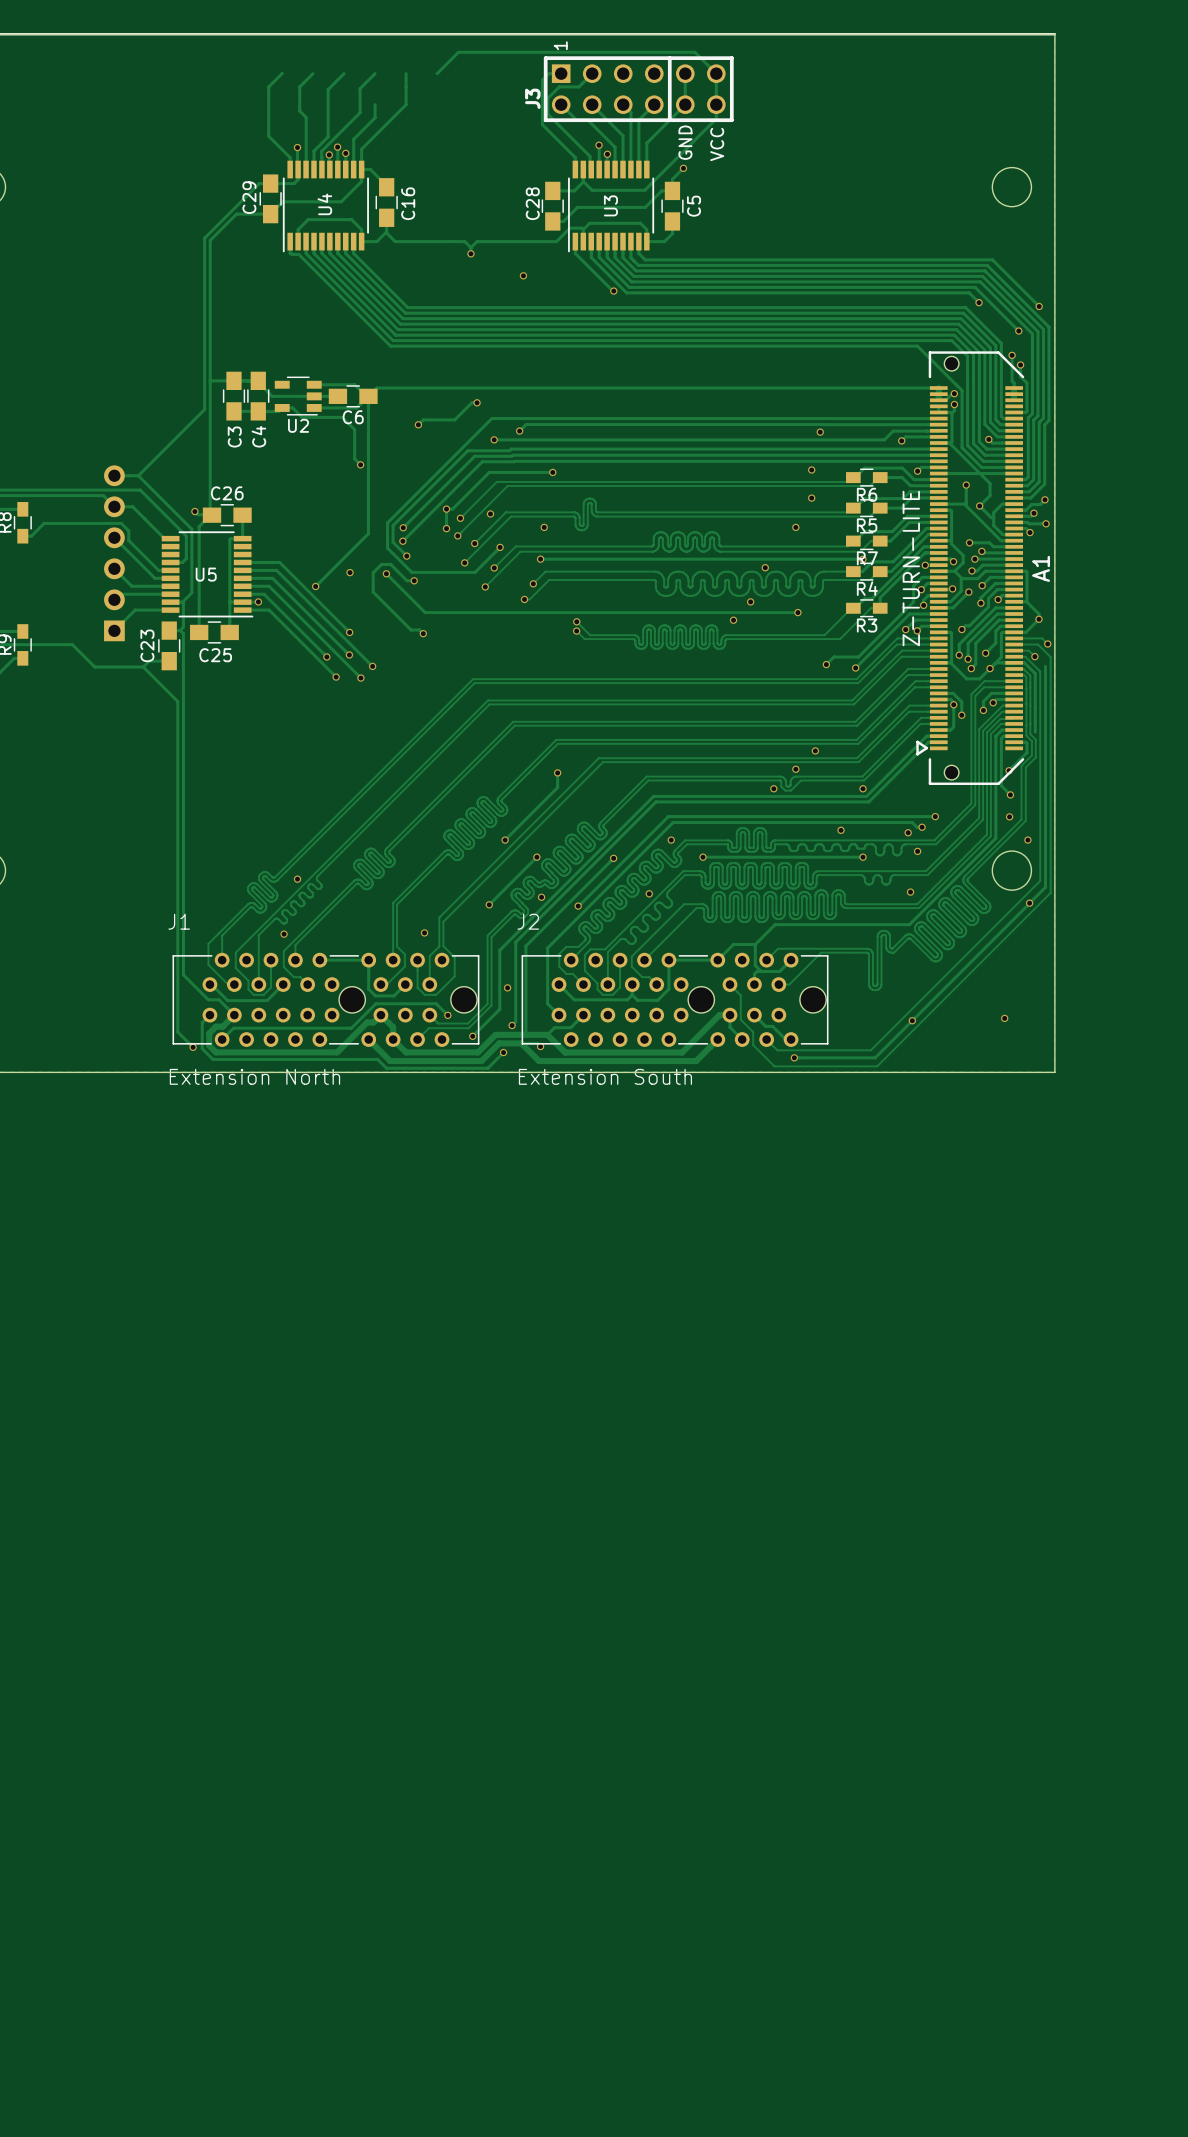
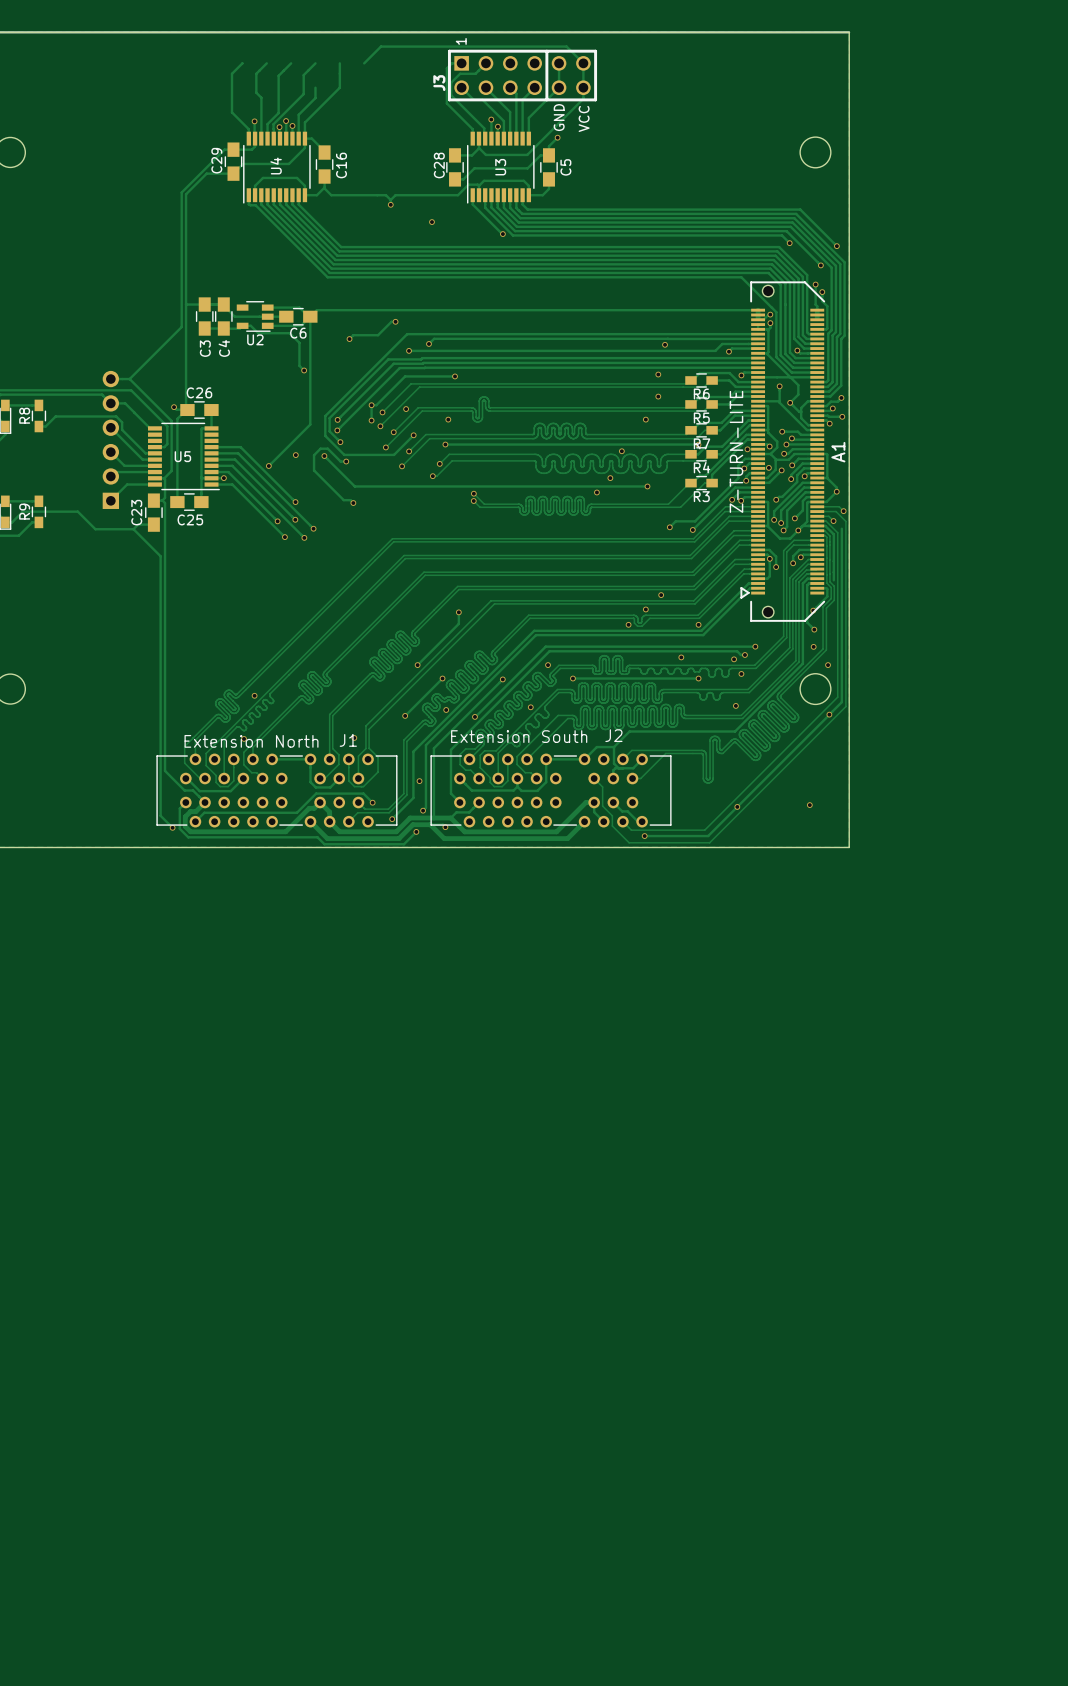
J1 name position: J1 (179, 921) -> J1 (348, 740)
J2 name position: J2 (528, 921) -> J2 (613, 735)
J1 footprint: [172, 952, 480, 1047] -> [156, 753, 398, 828]
J2 footprint: [521, 952, 829, 1047] -> [430, 753, 672, 828]
J1 value position: Extension North (254, 1076) -> Extension North (251, 741)
J2 value position: Extension South (605, 1076) -> Extension South (519, 736)

